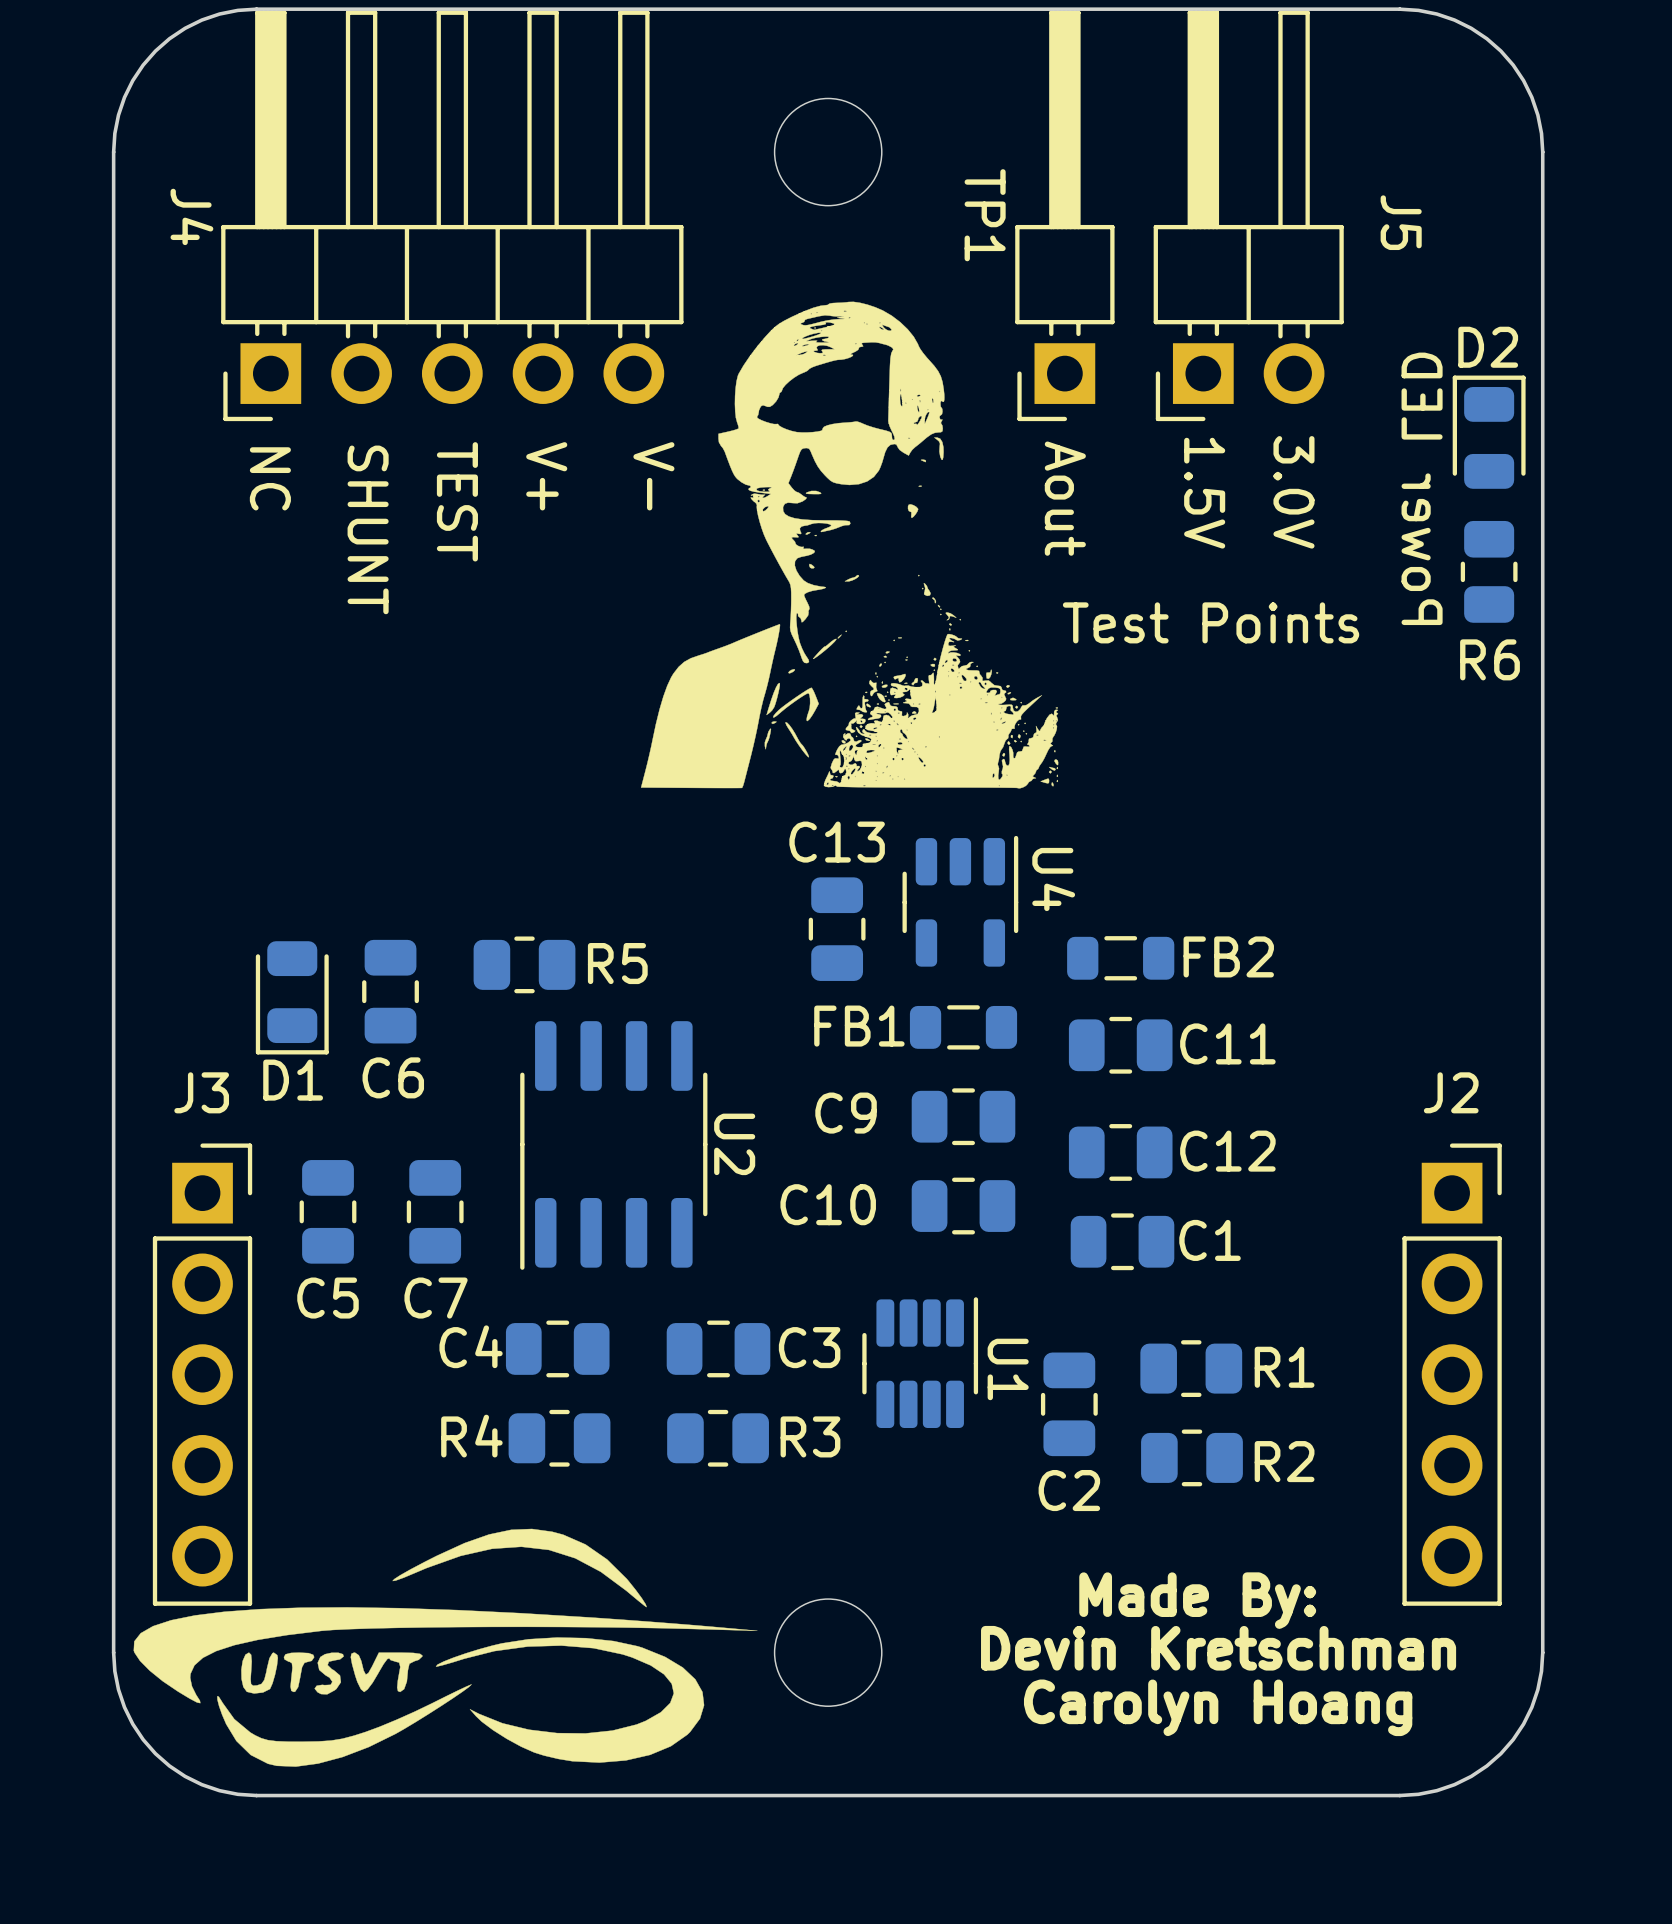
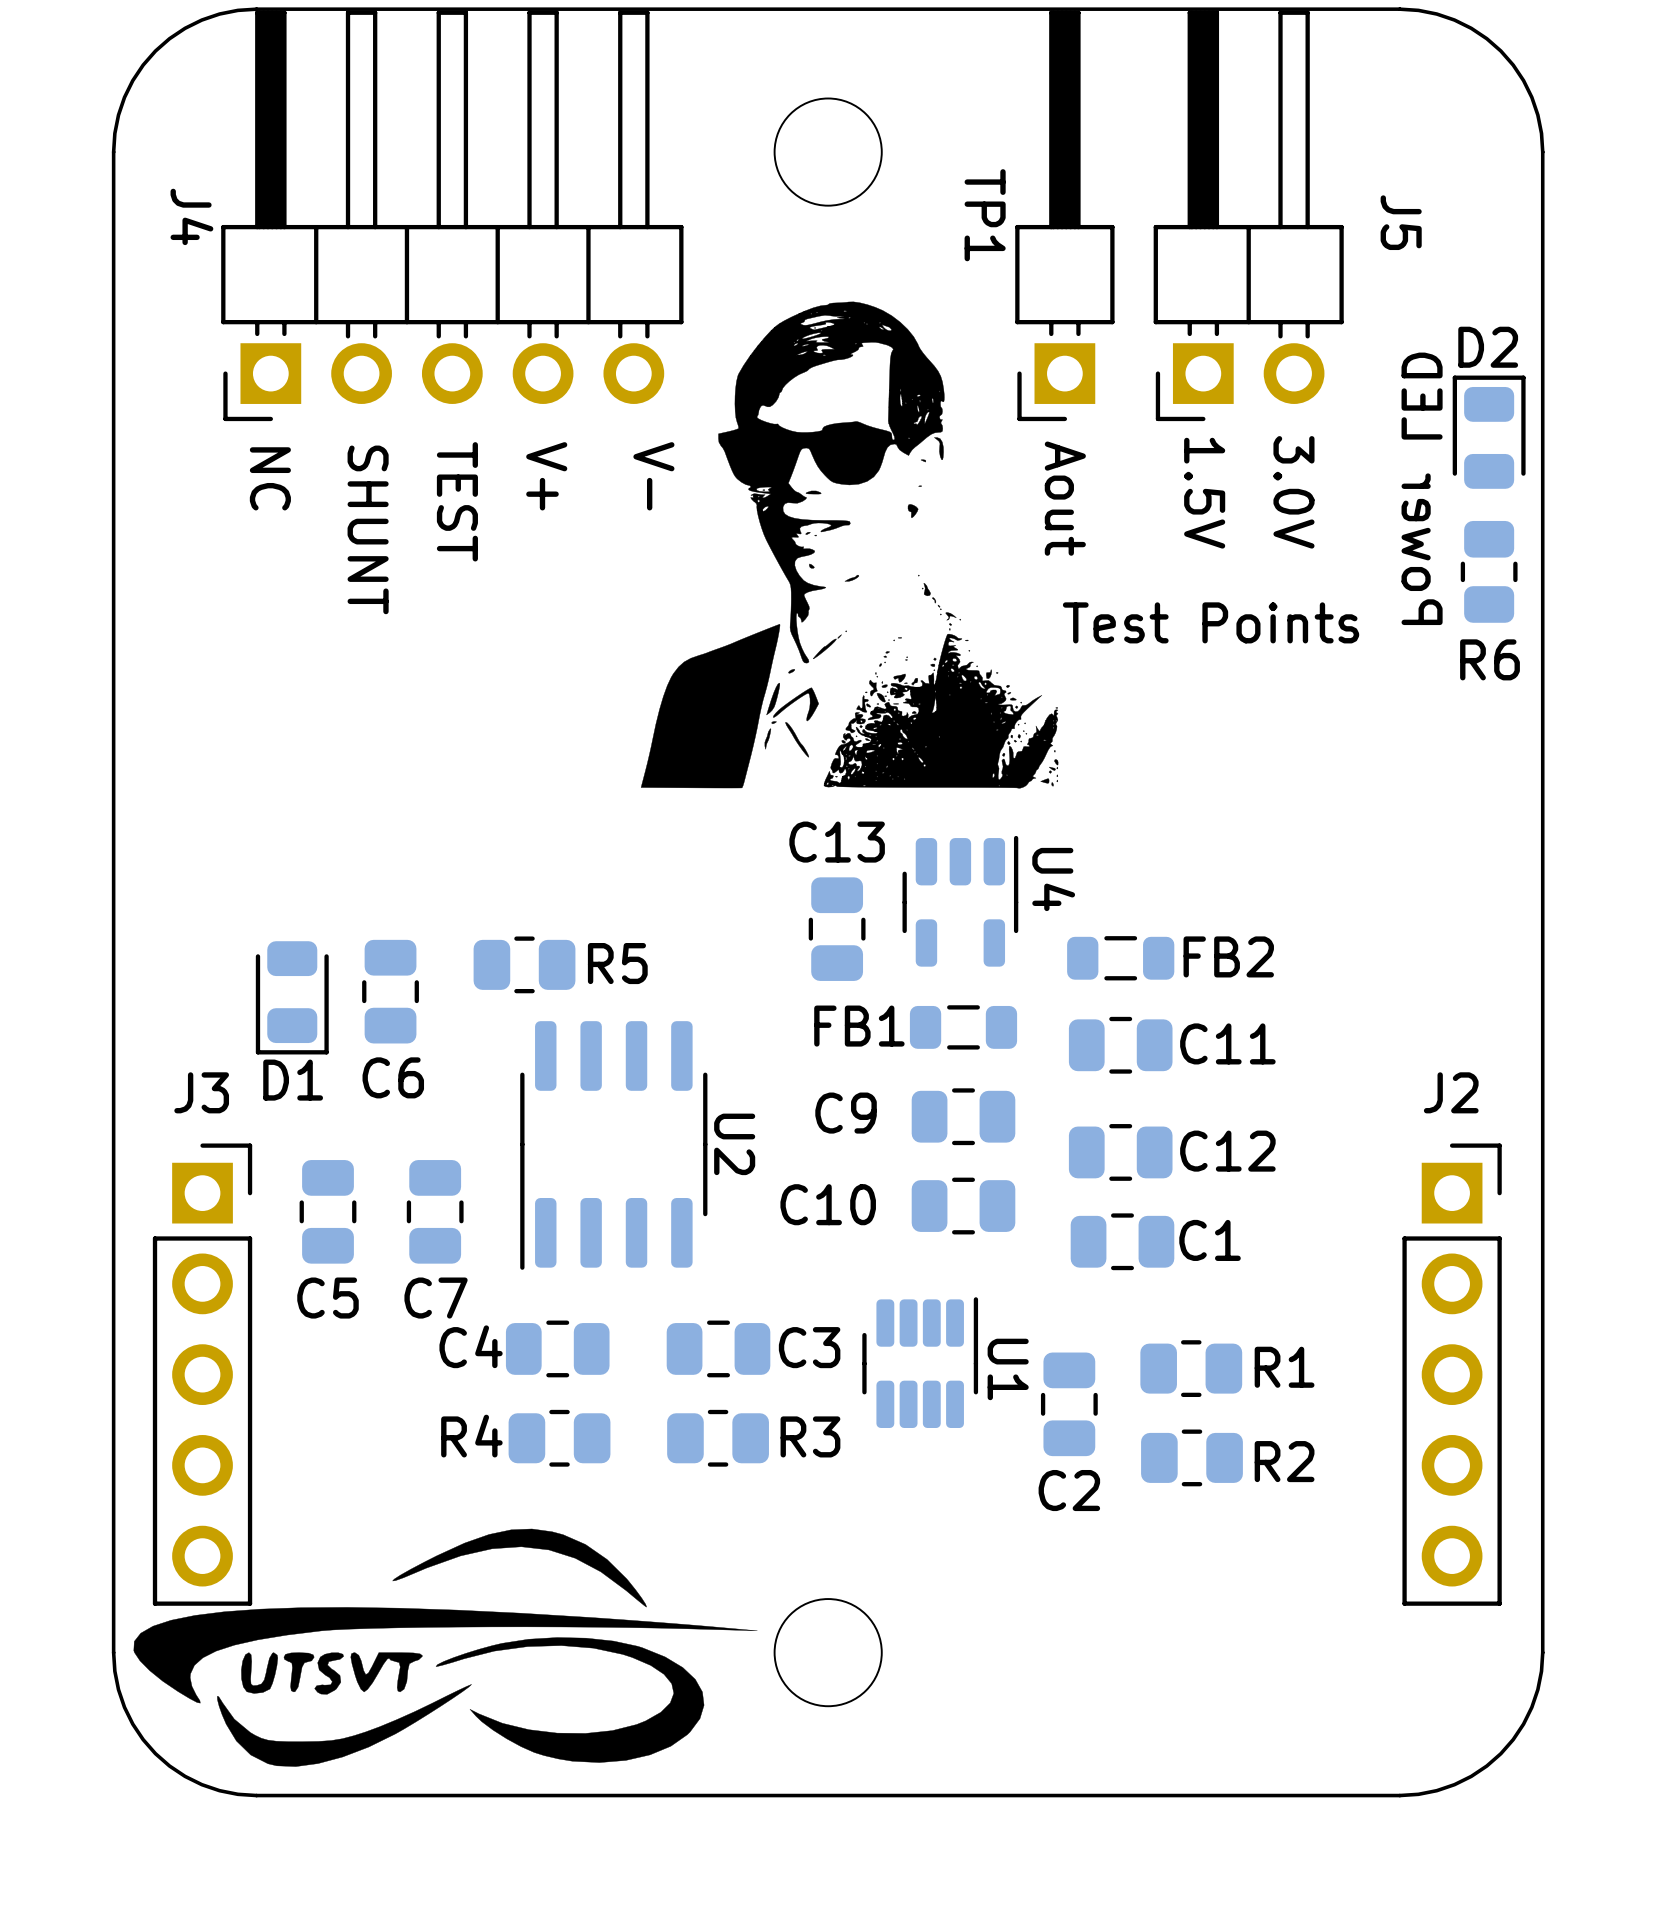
text: Made By: (1197, 1600) -> none
text: Devin Kretschman (1218, 1648) -> none
text: Carolyn Hoang (1218, 1707) -> none

